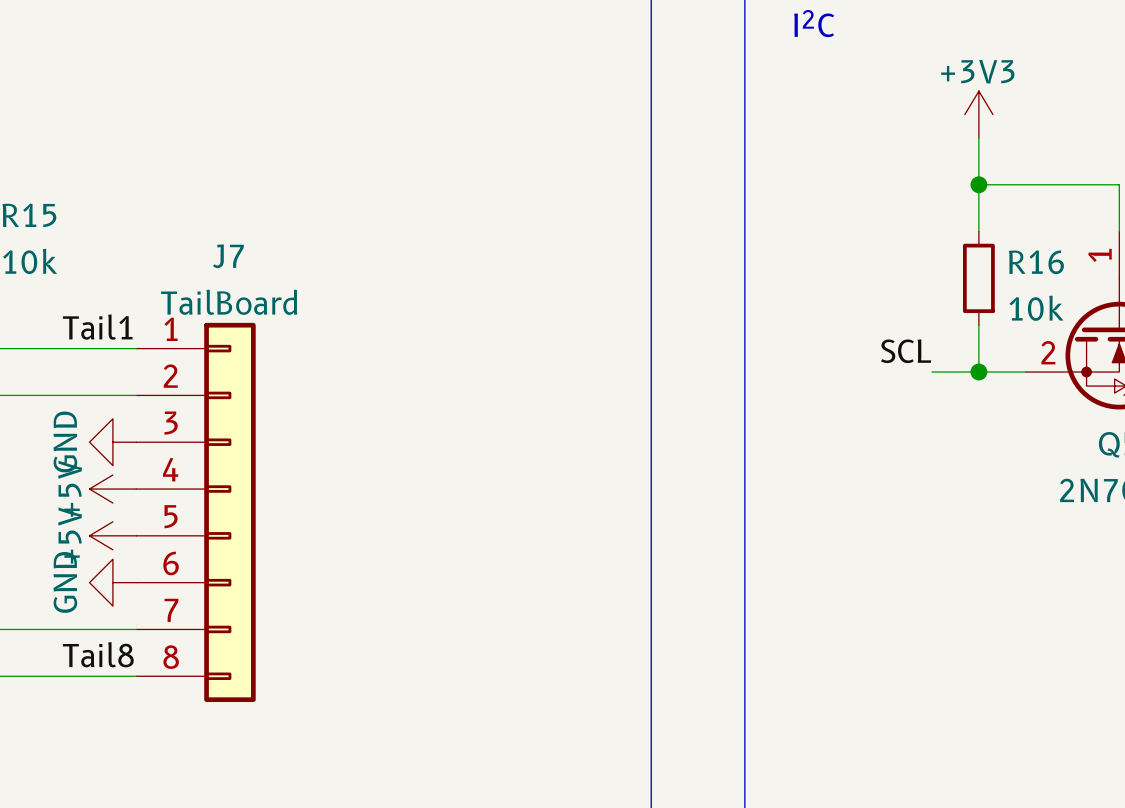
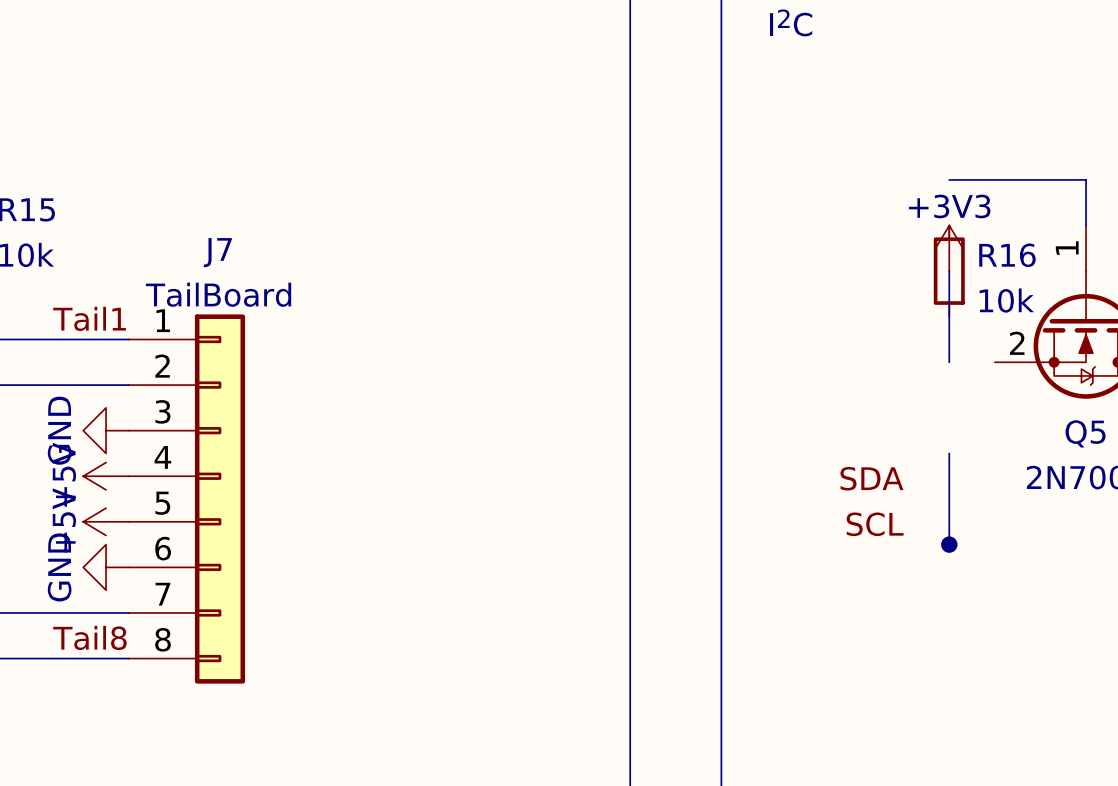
power symbol position: +3V3 (978, 114) -> +3V3 (949, 248)
wire: (978, 137) (978, 231) -> (949, 453) (949, 544)
junction: (978, 184) -> none
wire: none -> (949, 271) (949, 316)
label position: SCL (906, 351) -> SCL (875, 524)
wire: (932, 372) (1025, 372) -> none
junction: (978, 372) -> none
label: none -> SDA (871, 478)
junction: none -> (949, 544)

